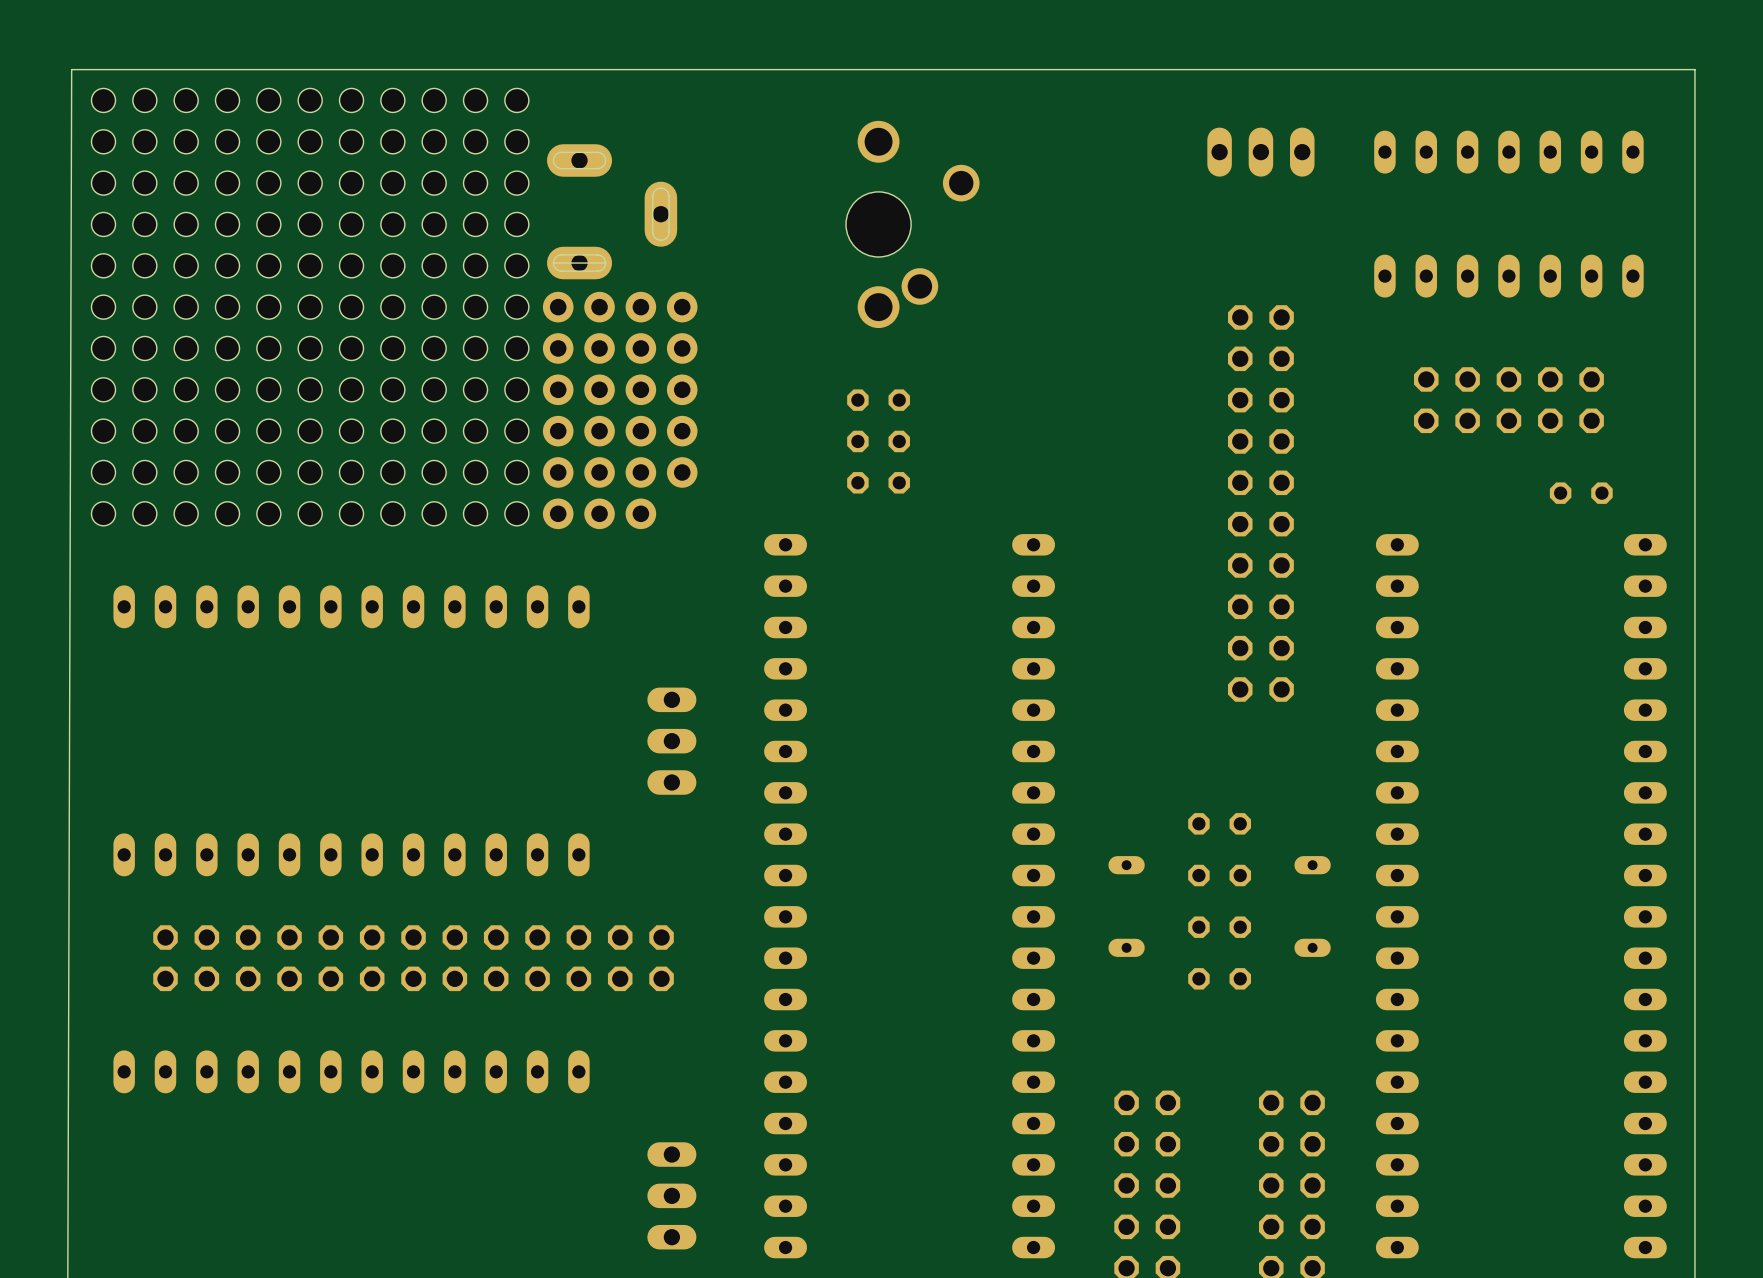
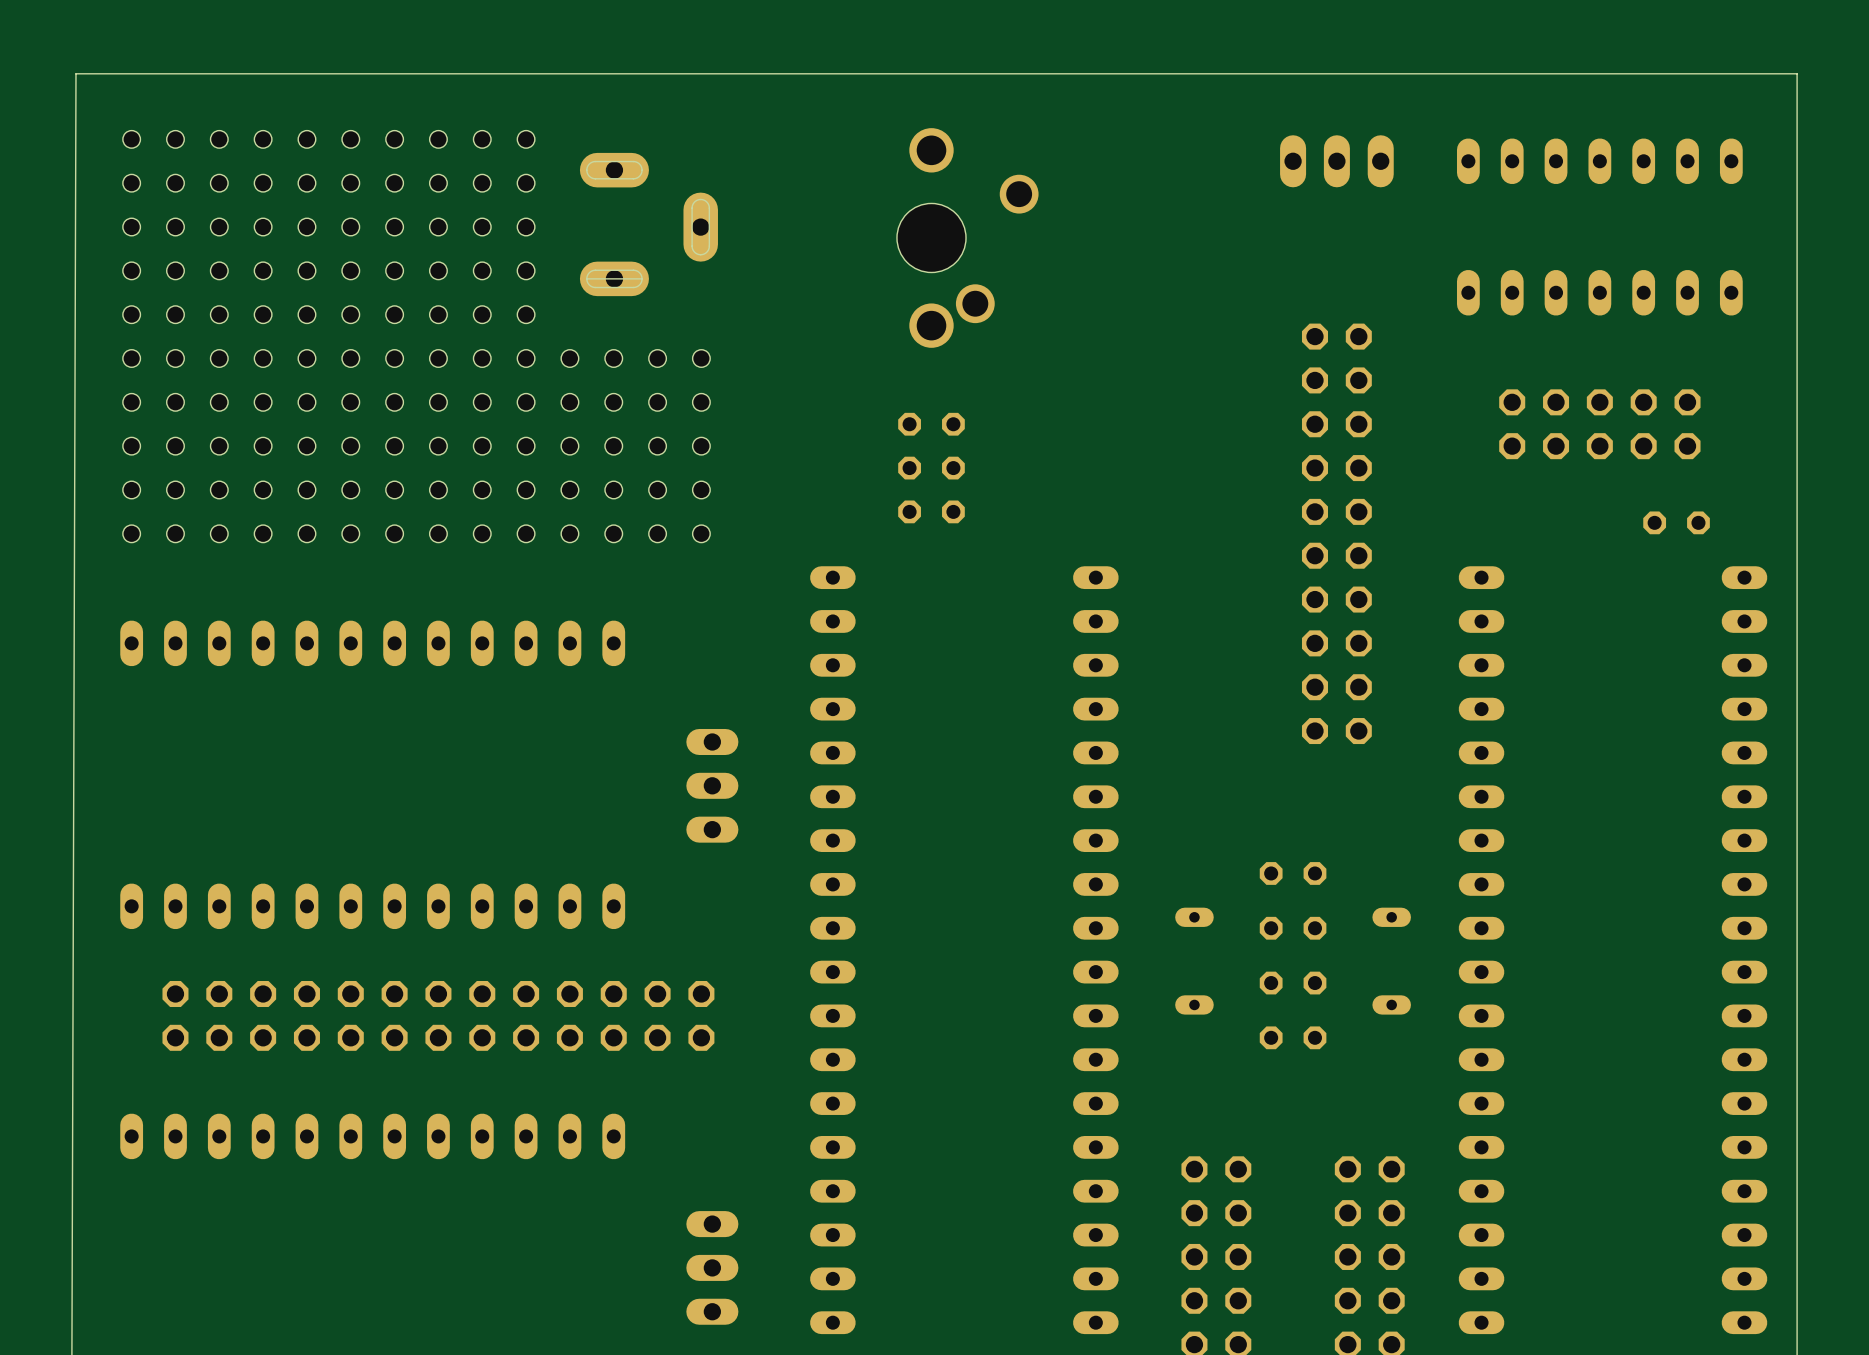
part: (310, 100) -> none
hole: none -> (131, 139)
hole: none -> (175, 139)
hole: none -> (219, 139)
hole: none -> (263, 139)
hole: none -> (306, 139)
hole: none -> (350, 139)
hole: none -> (394, 139)
hole: none -> (438, 139)
hole: none -> (482, 139)
hole: none -> (526, 139)
part: (310, 141) -> none
hole: none -> (131, 183)
hole: none -> (175, 183)
hole: none -> (219, 183)
hole: none -> (263, 183)
hole: none -> (306, 183)
hole: none -> (350, 183)
hole: none -> (394, 183)
hole: none -> (438, 183)
hole: none -> (482, 183)
hole: none -> (526, 183)
part: (310, 183) -> none
hole: none -> (131, 227)
hole: none -> (175, 227)
hole: none -> (219, 227)
hole: none -> (263, 227)
hole: none -> (306, 227)
hole: none -> (350, 227)
hole: none -> (394, 227)
hole: none -> (438, 227)
hole: none -> (482, 227)
hole: none -> (526, 227)
part: (310, 224) -> none
hole: none -> (131, 270)
hole: none -> (175, 270)
hole: none -> (219, 270)
hole: none -> (263, 270)
hole: none -> (306, 270)
hole: none -> (350, 270)
hole: none -> (394, 270)
hole: none -> (438, 270)
hole: none -> (482, 270)
hole: none -> (526, 270)
part: (310, 265) -> none
hole: none -> (131, 314)
hole: none -> (175, 314)
hole: none -> (219, 314)
hole: none -> (263, 314)
hole: none -> (306, 314)
hole: none -> (350, 314)
hole: none -> (394, 314)
hole: none -> (438, 314)
hole: none -> (482, 314)
hole: none -> (526, 314)
part: (310, 307) -> none
hole: none -> (131, 358)
hole: none -> (175, 358)
hole: none -> (219, 358)
hole: none -> (263, 358)
hole: none -> (306, 358)
hole: none -> (350, 358)
hole: none -> (394, 358)
hole: none -> (438, 358)
hole: none -> (482, 358)
hole: none -> (526, 358)
hole: none -> (569, 358)
hole: none -> (613, 358)
hole: none -> (657, 358)
hole: none -> (701, 358)
part: (310, 348) -> none
hole: none -> (131, 402)
hole: none -> (175, 402)
hole: none -> (219, 402)
hole: none -> (263, 402)
hole: none -> (306, 402)
hole: none -> (350, 402)
hole: none -> (394, 402)
hole: none -> (438, 402)
hole: none -> (482, 402)
hole: none -> (526, 402)
hole: none -> (569, 402)
hole: none -> (613, 402)
hole: none -> (657, 402)
hole: none -> (701, 402)
part: (310, 389) -> none
part: (682, 389) -> none
part: (558, 410) -> none
part: (599, 410) -> none
part: (640, 410) -> none
hole: none -> (131, 446)
hole: none -> (175, 446)
hole: none -> (219, 446)
hole: none -> (263, 446)
hole: none -> (306, 446)
hole: none -> (350, 446)
hole: none -> (394, 446)
hole: none -> (438, 446)
hole: none -> (482, 446)
hole: none -> (526, 446)
hole: none -> (569, 446)
hole: none -> (613, 446)
hole: none -> (657, 446)
hole: none -> (701, 446)
part: (310, 431) -> none
hole: none -> (131, 489)
hole: none -> (175, 489)
hole: none -> (219, 489)
hole: none -> (263, 489)
hole: none -> (306, 489)
hole: none -> (350, 489)
hole: none -> (394, 489)
hole: none -> (438, 489)
hole: none -> (482, 489)
hole: none -> (526, 489)
hole: none -> (569, 489)
hole: none -> (613, 489)
hole: none -> (657, 489)
hole: none -> (701, 489)
part: (310, 472) -> none
hole: none -> (131, 533)
hole: none -> (175, 533)
hole: none -> (219, 533)
hole: none -> (263, 533)
hole: none -> (306, 533)
hole: none -> (350, 533)
hole: none -> (394, 533)
hole: none -> (438, 533)
hole: none -> (482, 533)
hole: none -> (526, 533)
hole: none -> (569, 533)
hole: none -> (613, 533)
hole: none -> (657, 533)
hole: none -> (701, 533)
part: (310, 513) -> none

